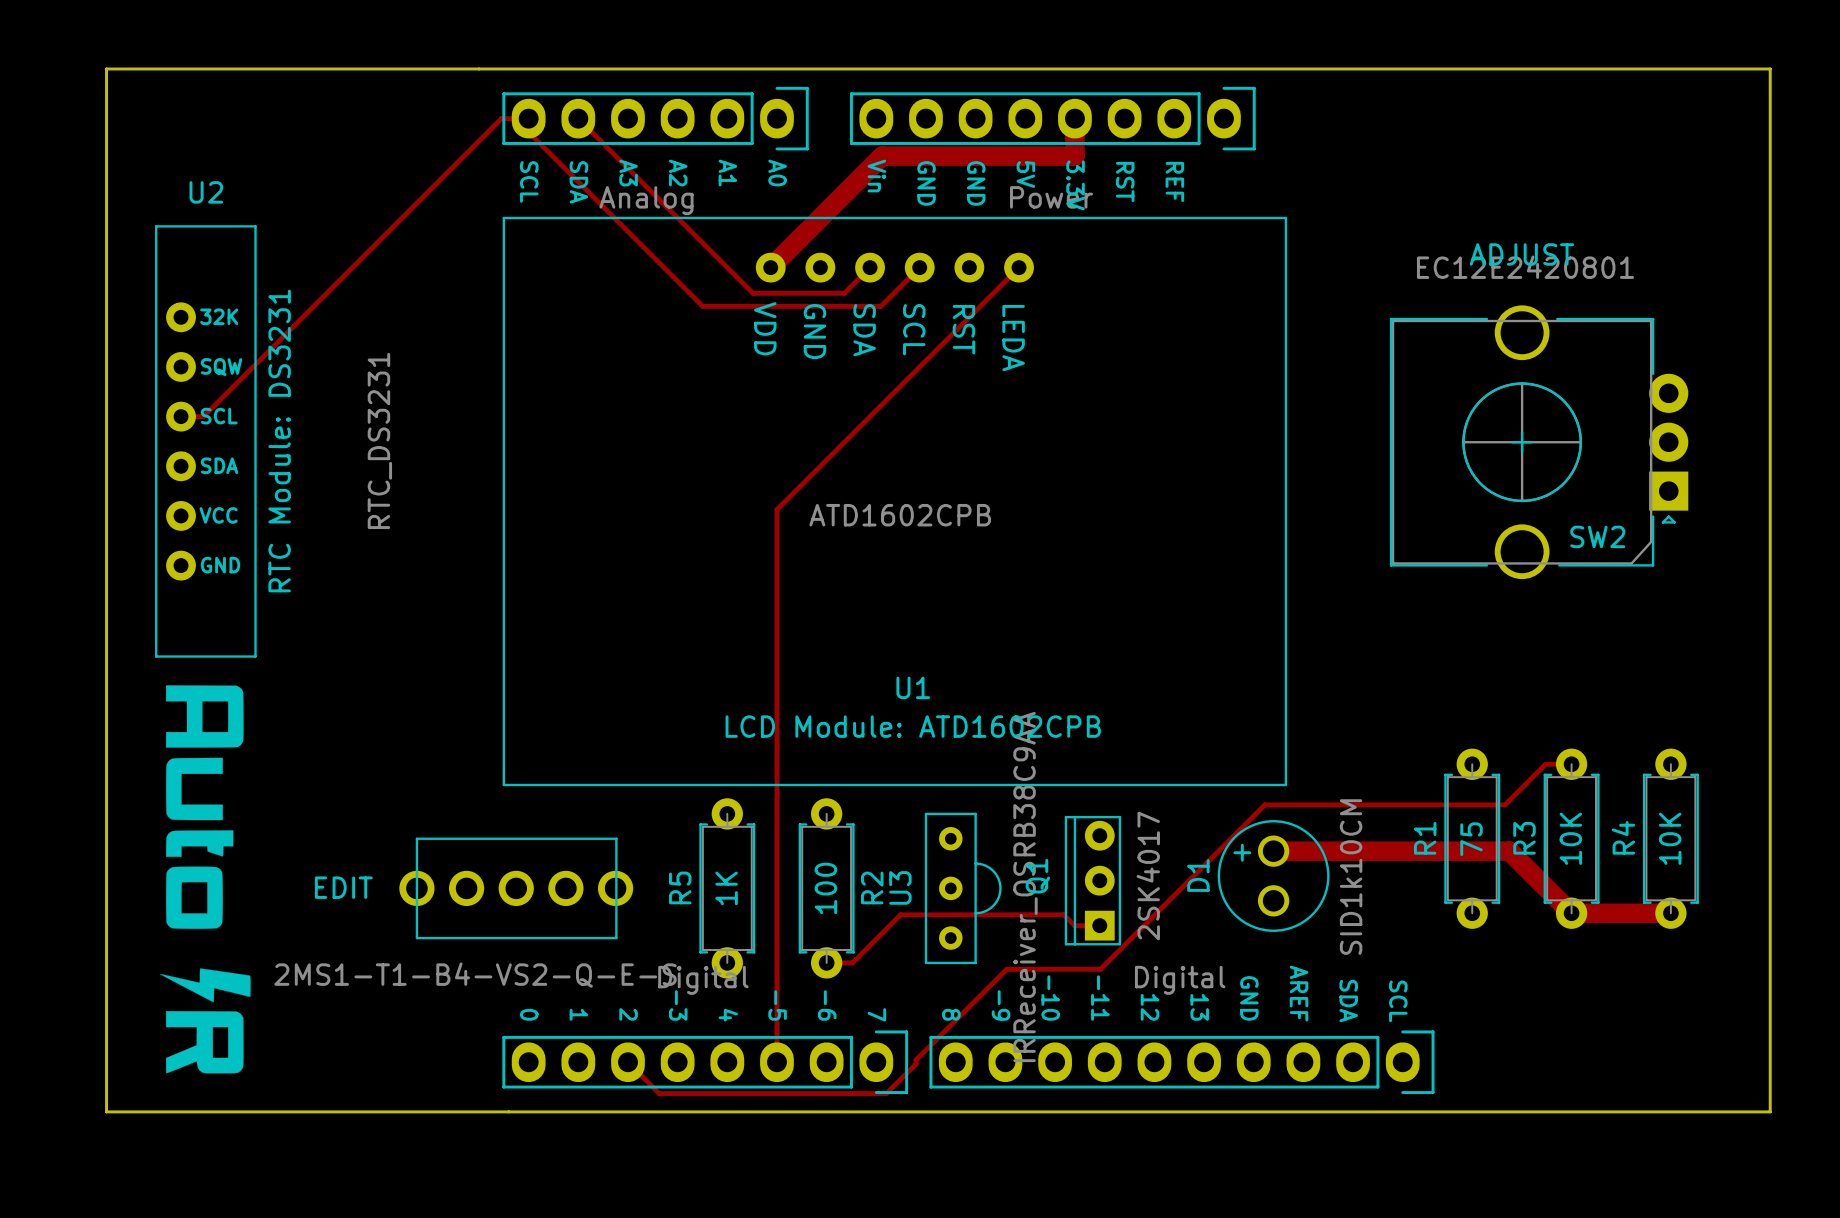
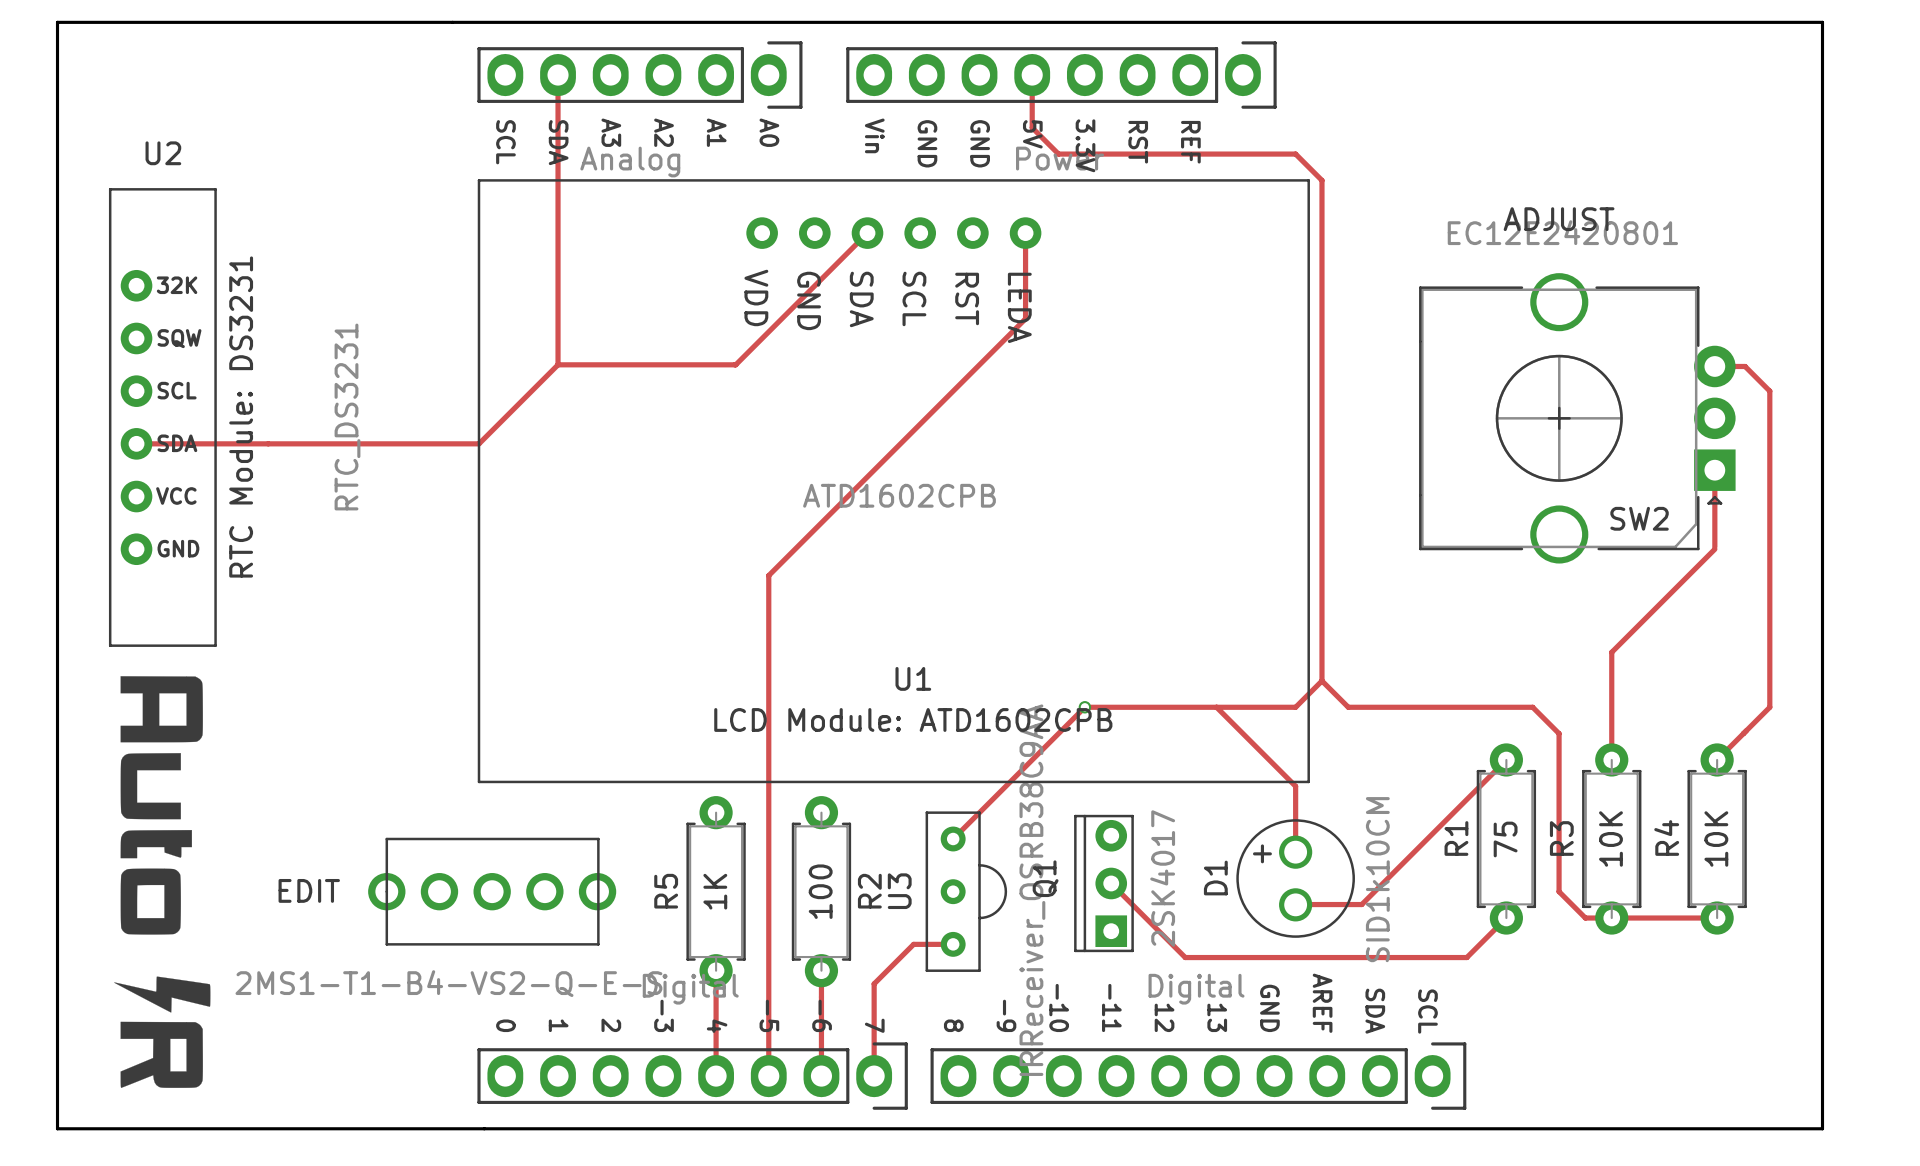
track: (515, 118) (702, 306) (881, 306) (919, 267) -> none
track: (528, 118) (501, 118) (203, 416) (181, 416) -> none
track: (578, 118) (753, 293) (844, 293) -> (558, 364) (735, 364) (840, 260)
track: none -> (558, 75) (558, 364)
track: none -> (1032, 75) (1032, 127) (1058, 154) (1295, 154) (1321, 180) (1321, 680)
track: (1074, 118) (1074, 156) (882, 156) (770, 267) -> none
track: (1019, 267) (776, 509) (776, 590) -> (1025, 233) (1025, 318) (768, 575)
track: none -> (558, 364) (478, 443) (136, 443)
track: none -> (1714, 366) (1745, 366) (1769, 391) (1769, 707) (1717, 759)
track: none -> (1714, 470) (1714, 546)
track: none -> (1321, 680) (1295, 707) (1084, 707) (953, 838)
via: none -> (1084, 707)
track: none -> (1216, 707) (1295, 786) (1295, 852)
track: none -> (1506, 759) (1361, 904) (1295, 904)
track: (1571, 764) (1545, 764) (1505, 804) (1264, 804) (1100, 969) (1006, 969) (916, 1060) (916, 1064) (886, 1093) (659, 1093) (627, 1062) -> (1611, 759) (1611, 652) (1714, 549)
track: (1273, 851) (1509, 851) (1571, 913) -> (1321, 680) (1348, 707) (1532, 707) (1559, 733) (1559, 891) (1585, 918) (1611, 918)
track: none -> (1111, 883) (1185, 957) (1466, 957) (1506, 918)
track width: thick (1571, 913) (1670, 913) -> thin (1611, 918) (1717, 918)
track: (1099, 925) (1074, 925) (1063, 914) (900, 914) (852, 962) (826, 962) -> (830, 1076) (821, 1076) (821, 970)
track: none -> (953, 944) (913, 944) (874, 983) (874, 1076)
track: none -> (716, 970) (716, 1076)

